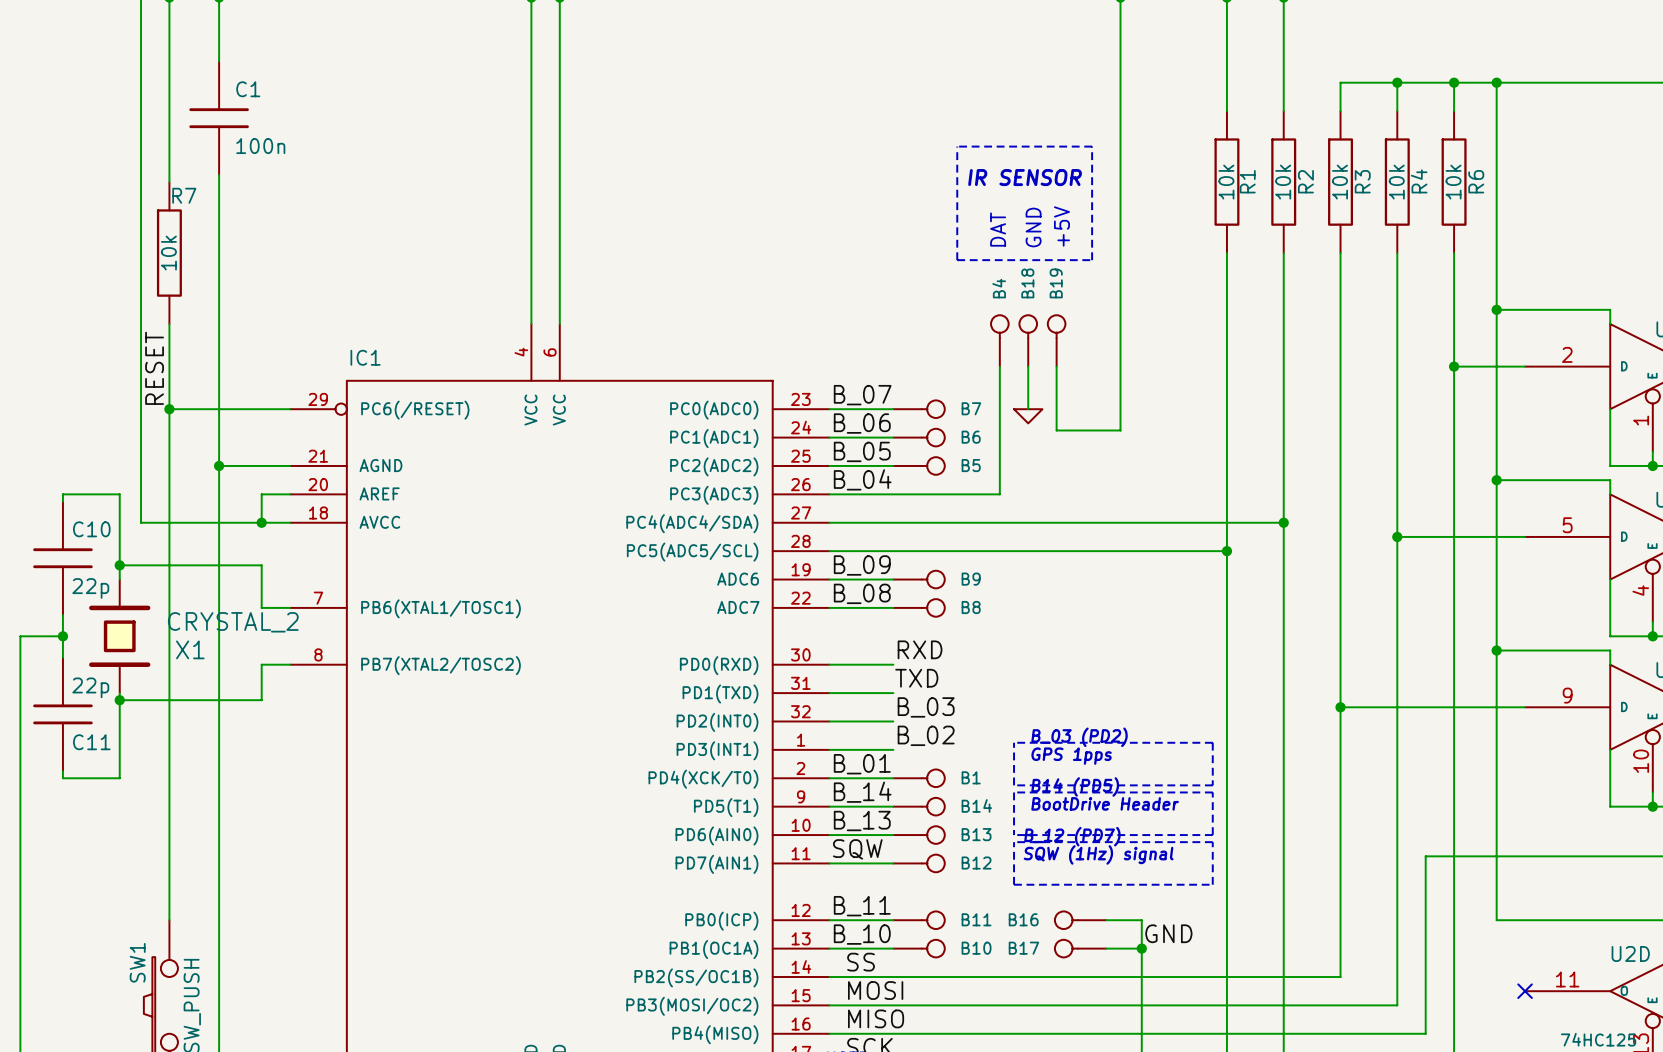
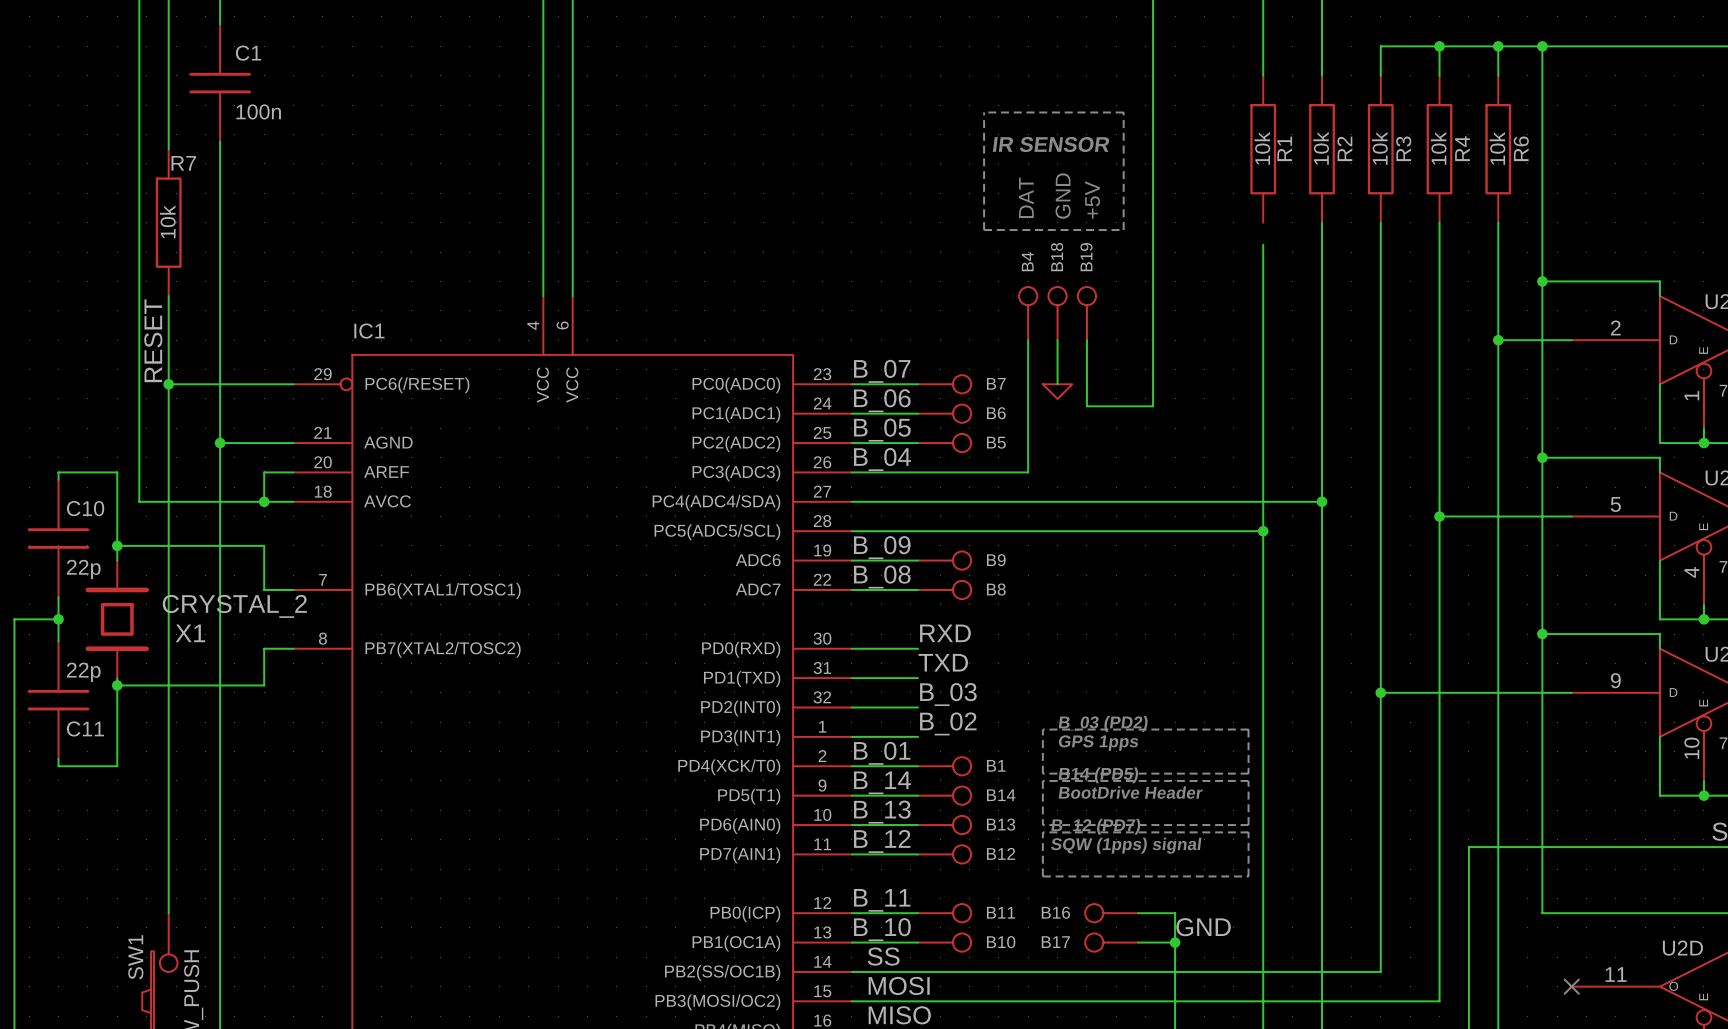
wire: (1226, 253) (1226, 274) -> none
label: SQW (857, 849) -> B_12 (882, 841)
text: SQW (1Hz) signal (1098, 854) -> SQW (1pps) signal (1126, 845)

